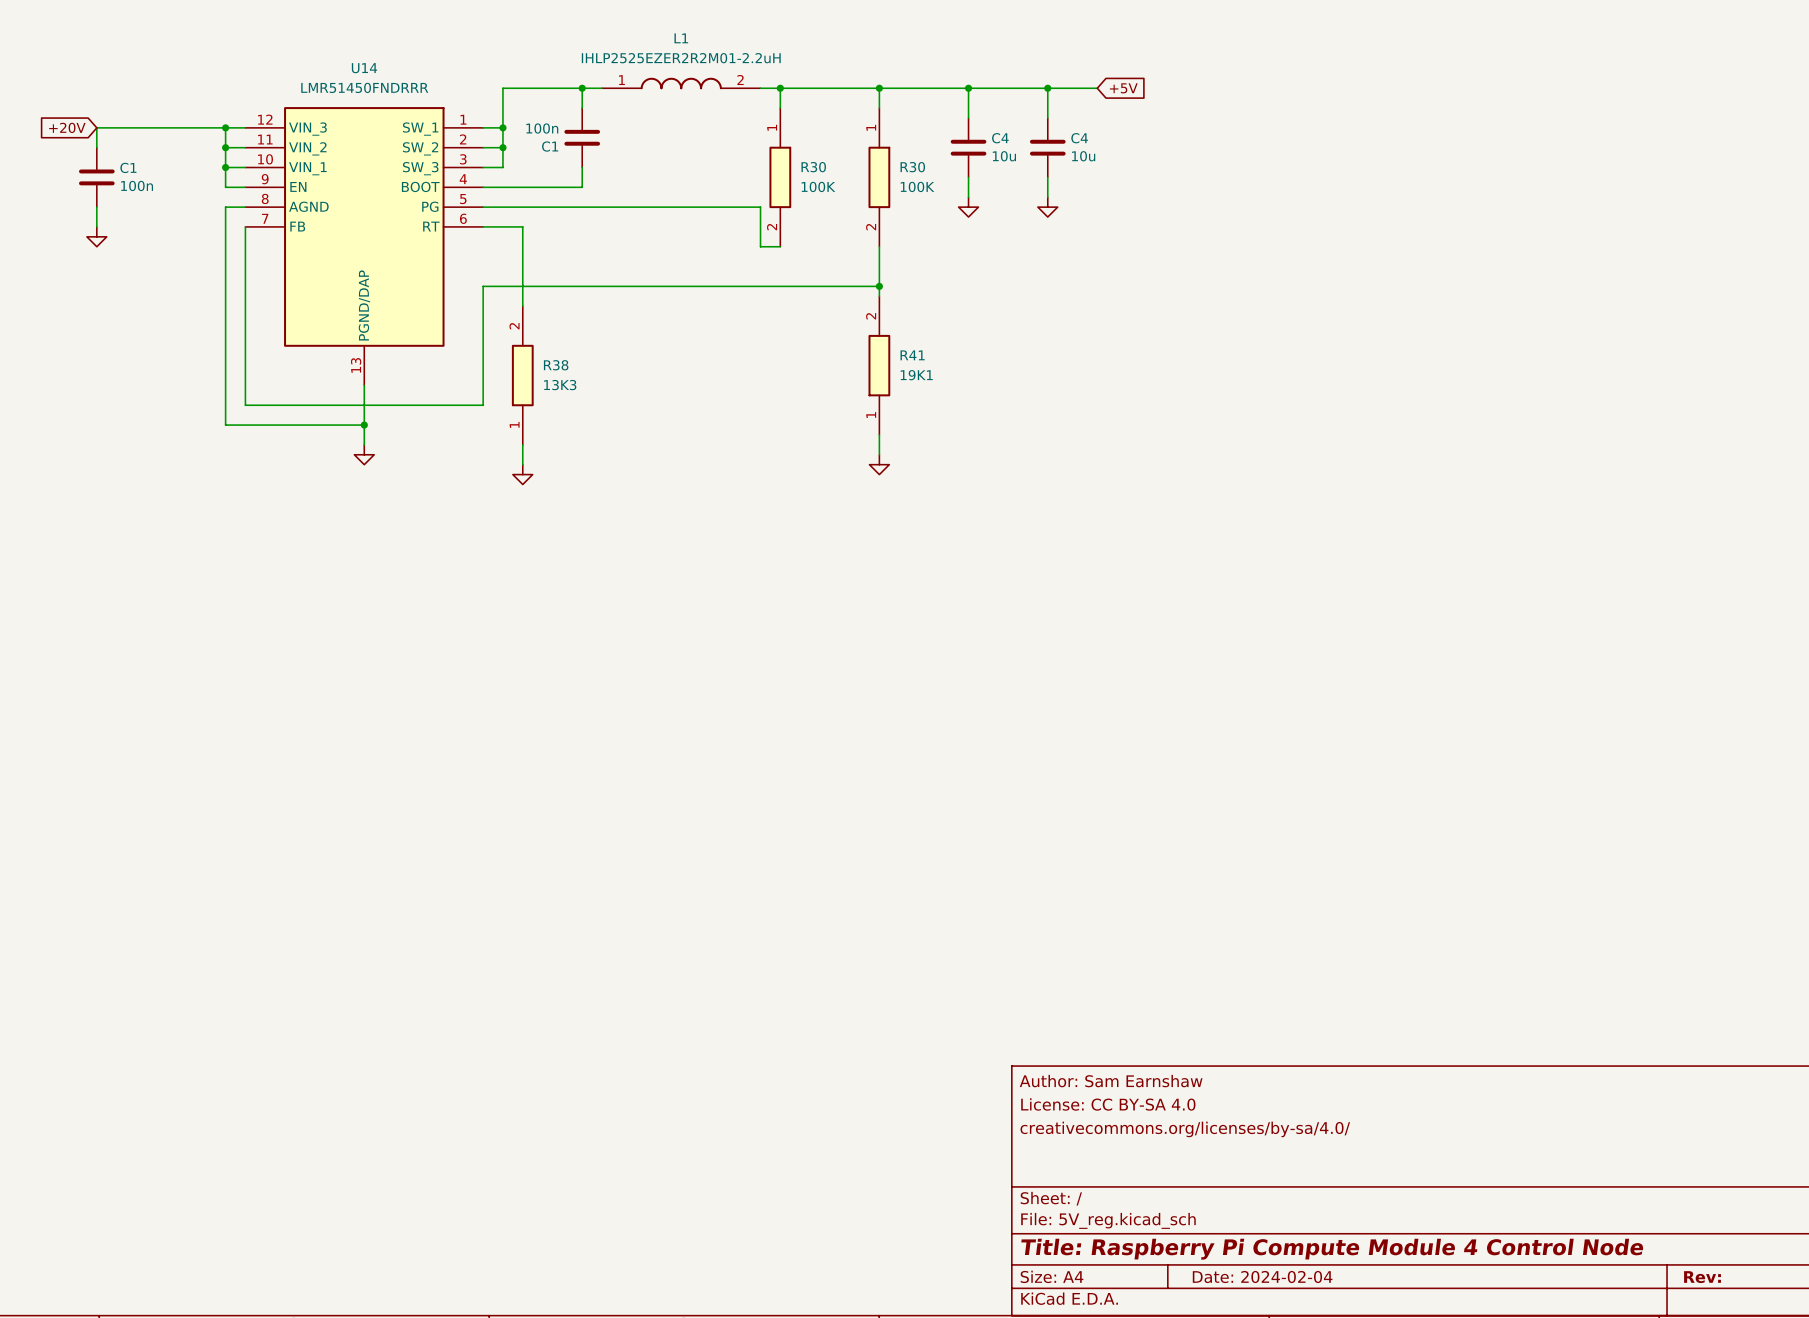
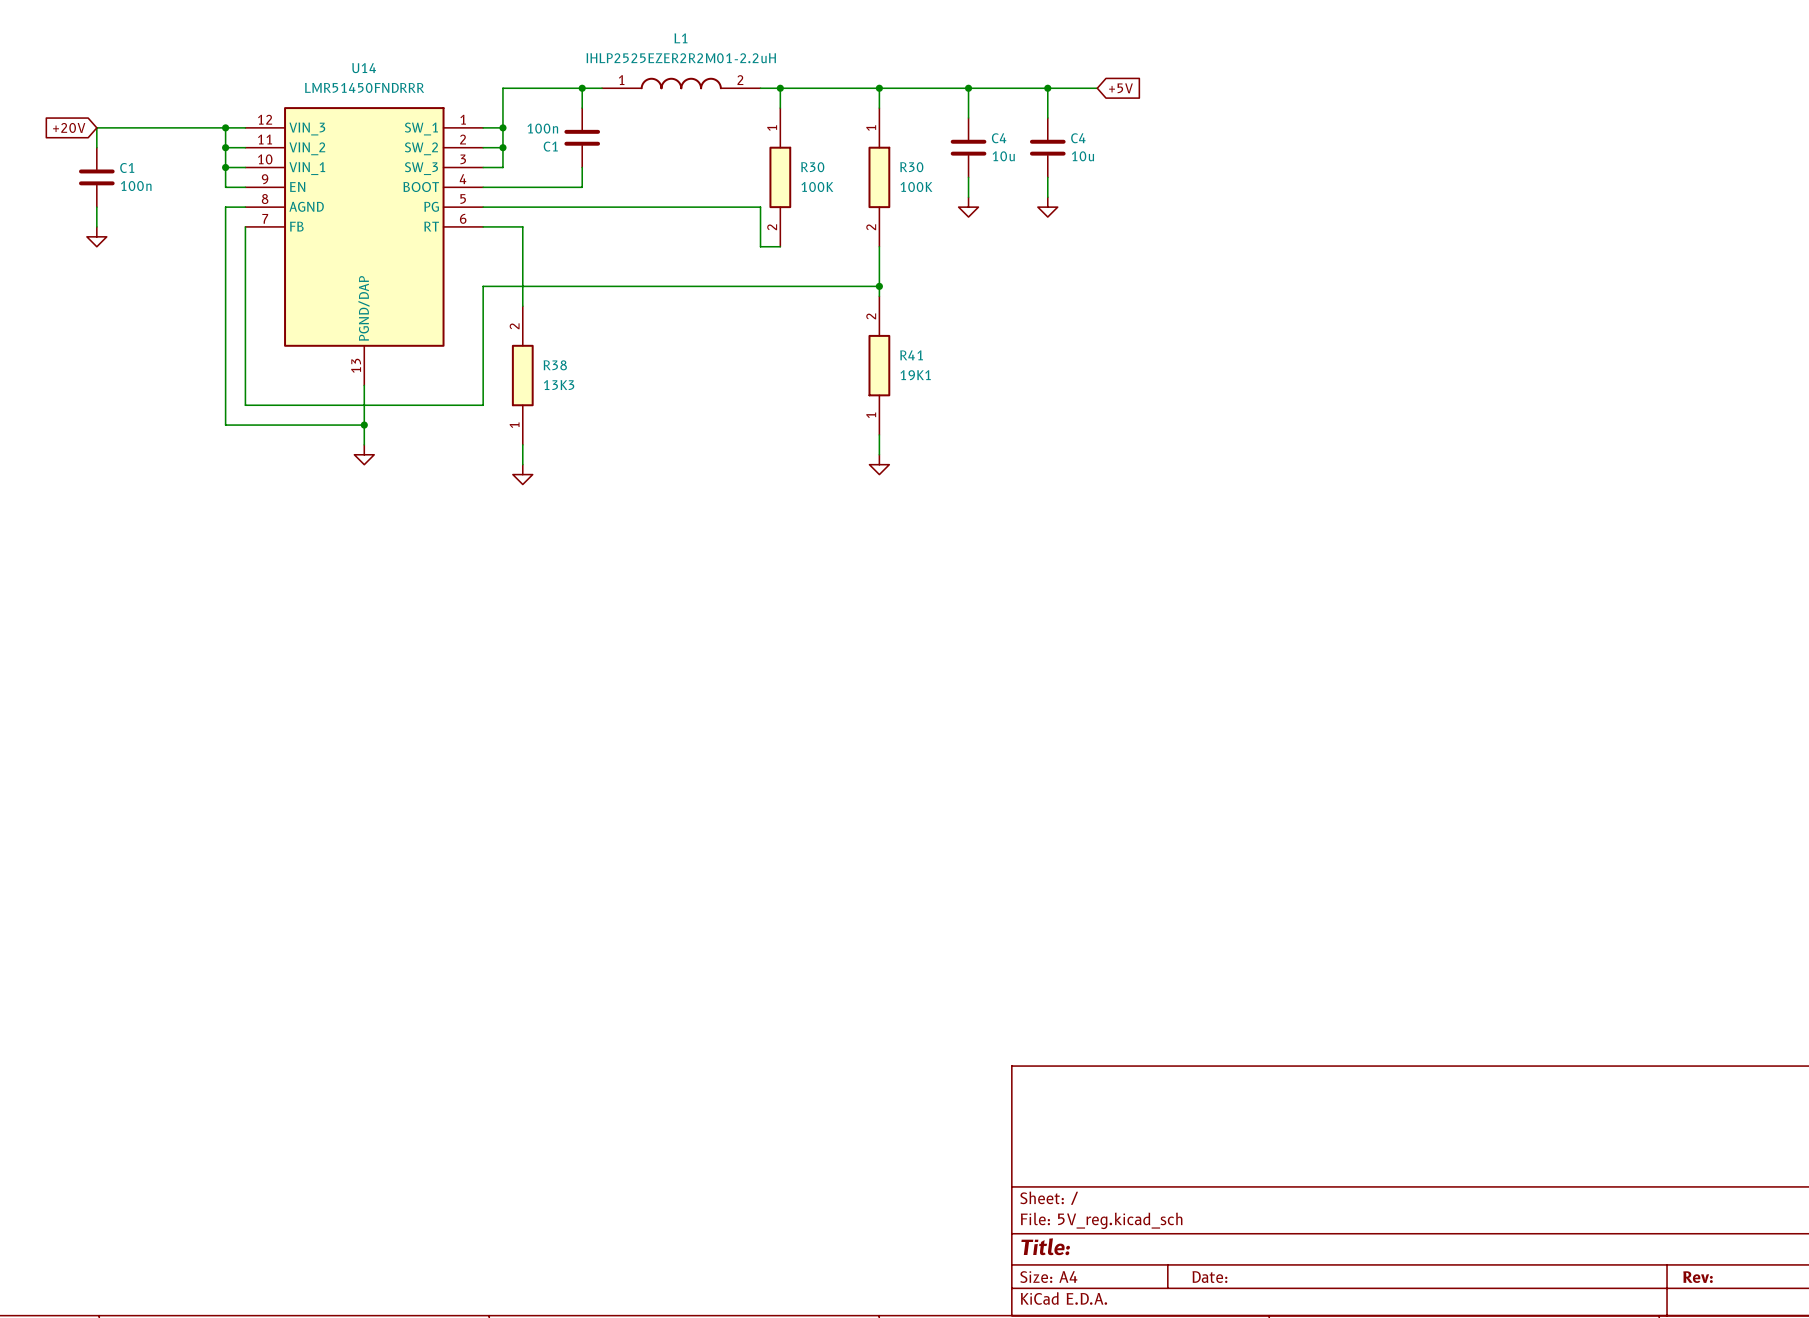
title block: Author: Sam Earnshaw (1111, 1081) -> none
title block: License: CC BY-SA 4.0 (1108, 1104) -> none
title block: creativecommons.org/licenses/by-sa/4.0/ (1185, 1129) -> none
title block: Title: Raspberry Pi Compute Module 4 Control Node (1332, 1249) -> Title: (1045, 1246)
title block: Date: 2024-02-04 (1262, 1276) -> Date: (1209, 1277)

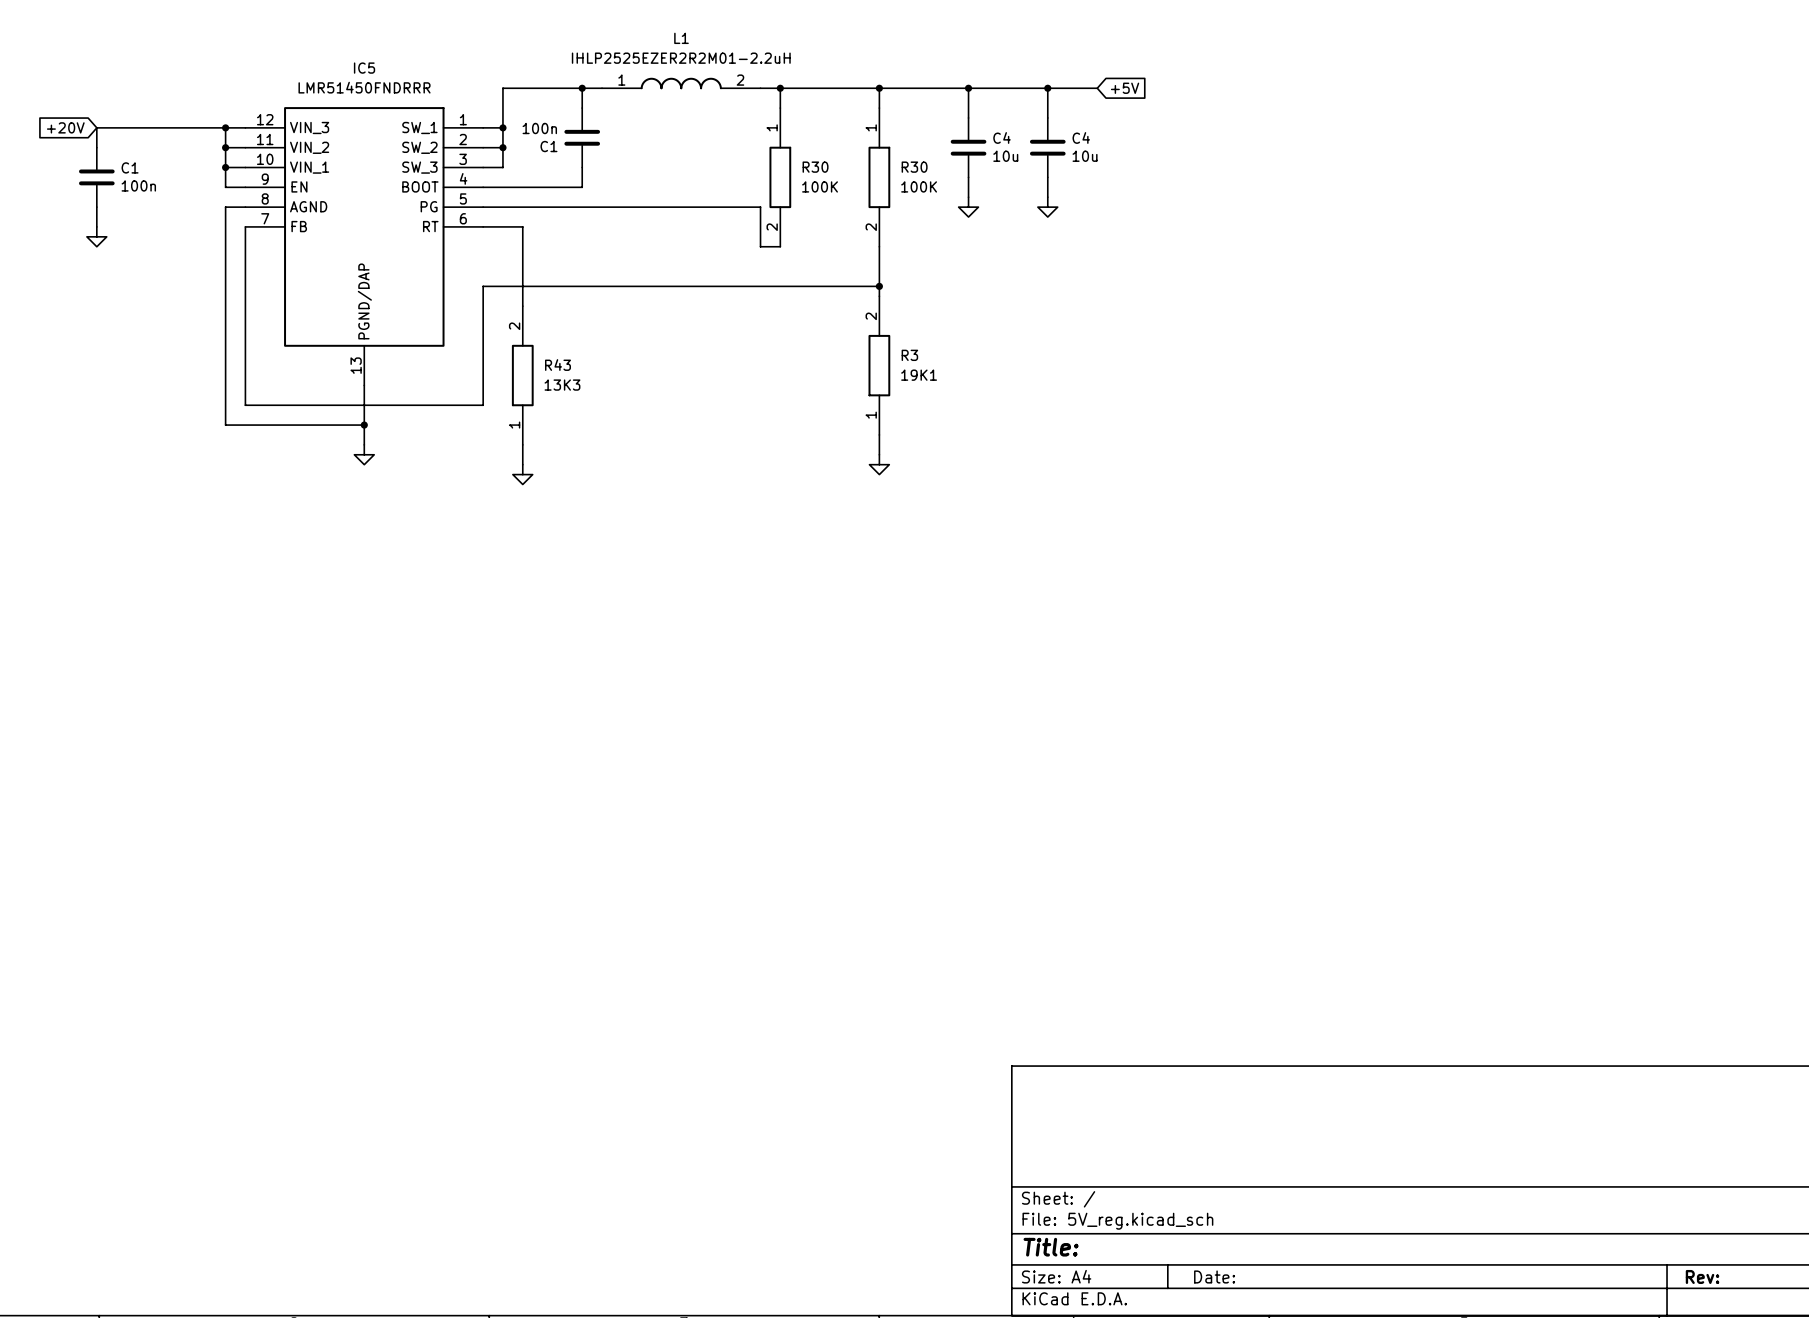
U14 name: U14 (364, 68) -> IC5 (364, 68)
R41 name: R41 (911, 355) -> R3 (909, 355)
R38 name: R38 (555, 365) -> R43 (557, 365)

